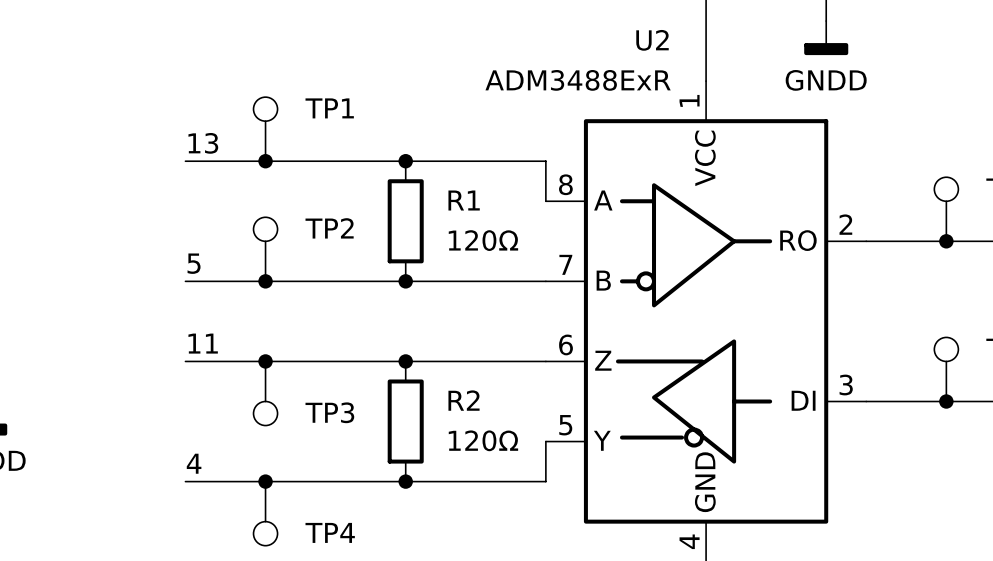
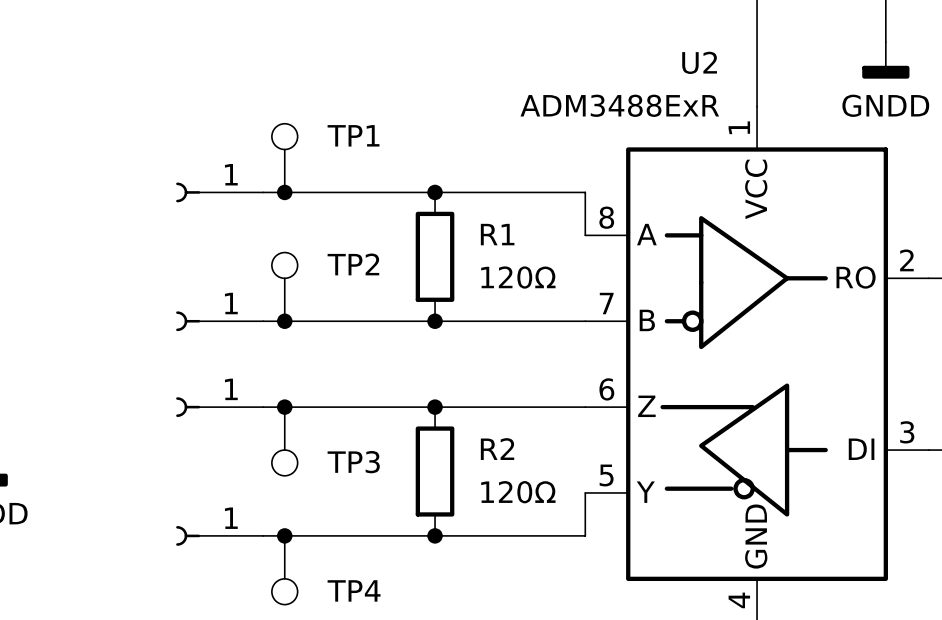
label: 13 (203, 143) -> none
part: none -> (219, 192)
label: 5 (194, 263) -> none
part: none -> (219, 321)
label: 11 (203, 343) -> none
part: none -> (219, 407)
label: 4 (194, 463) -> none
part: none -> (219, 535)

